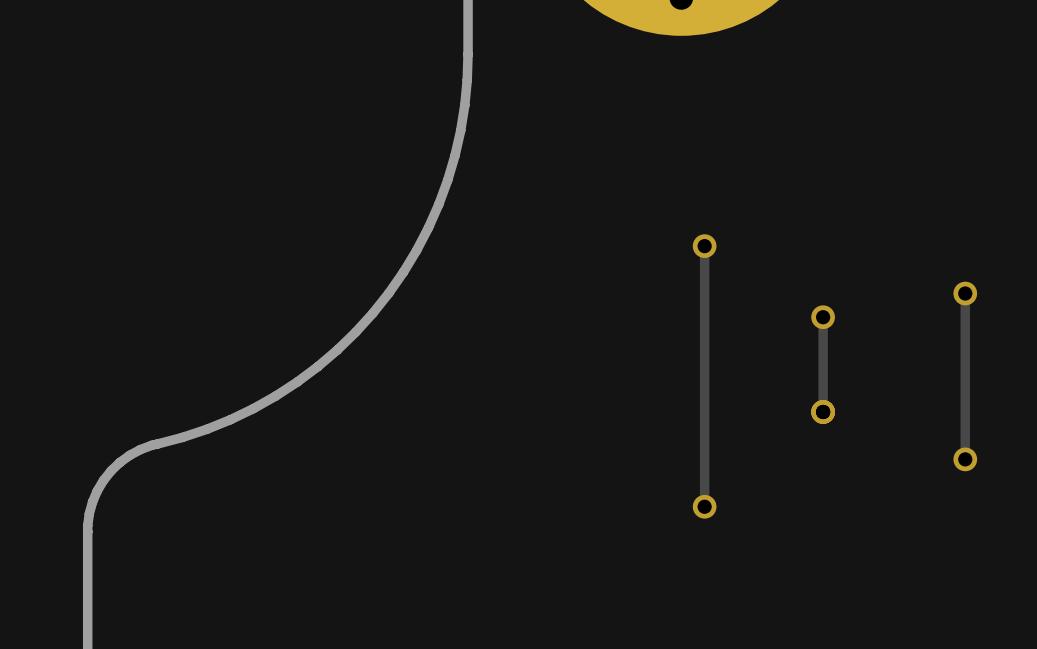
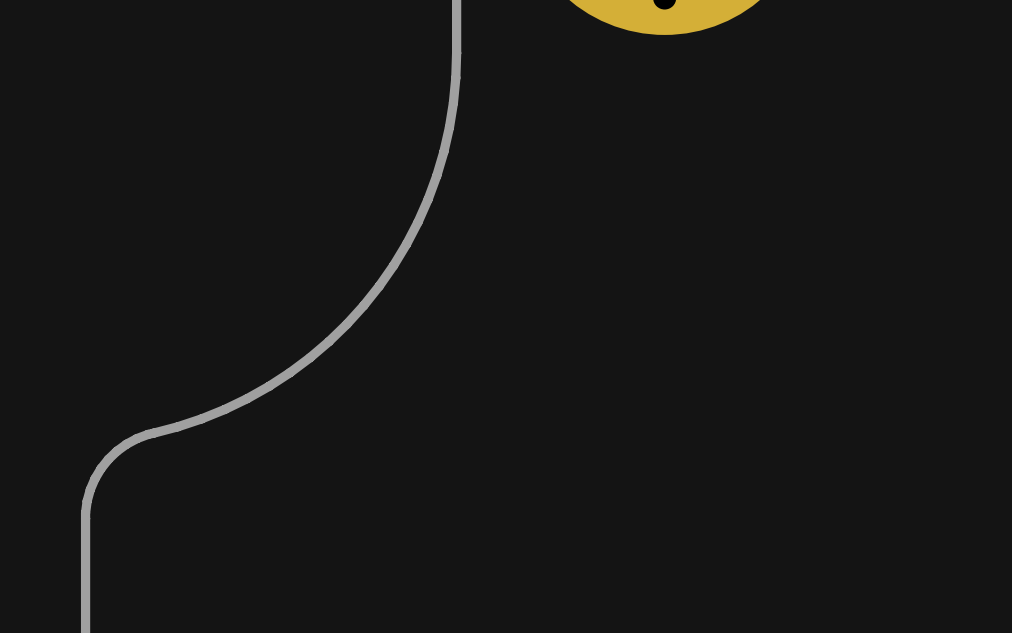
track: (704, 246) (704, 506) -> none
via: (704, 246) -> none
track: (965, 293) (965, 459) -> none
via: (965, 293) -> none
track: (823, 317) (823, 411) -> none
via: (823, 317) -> none
via: (823, 411) -> none
via: (965, 459) -> none
via: (704, 506) -> none

